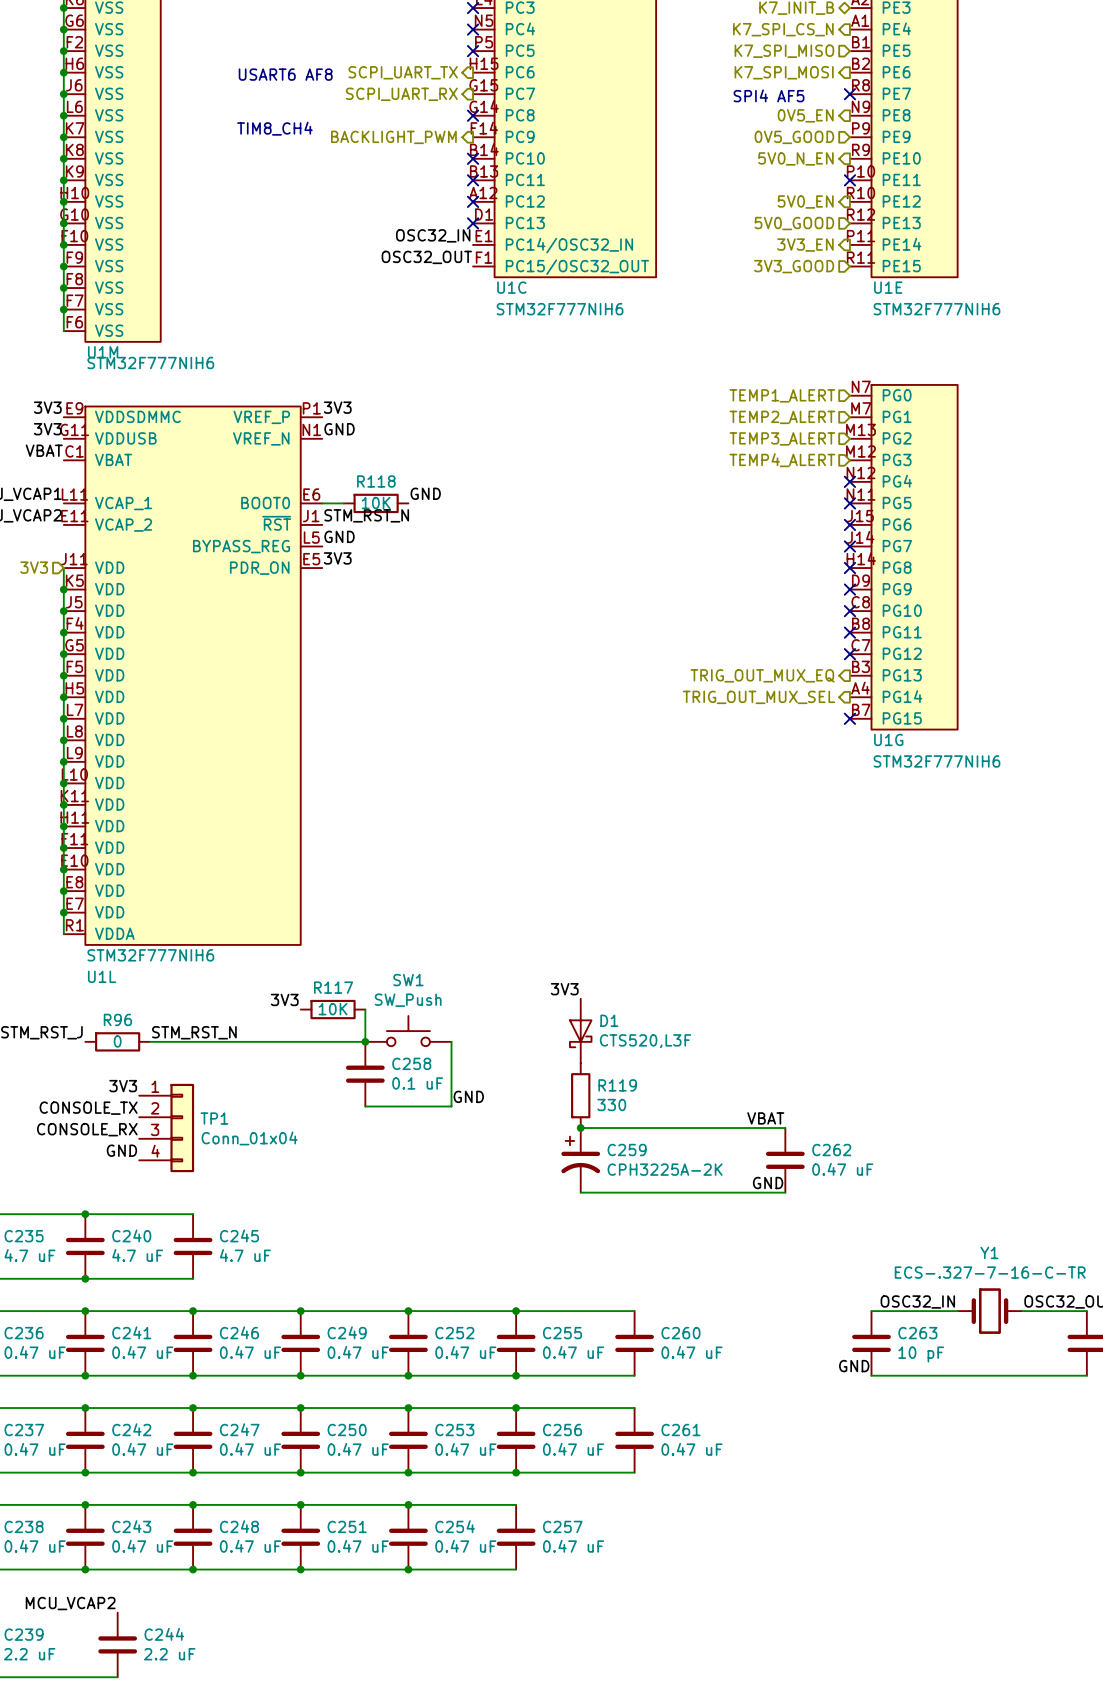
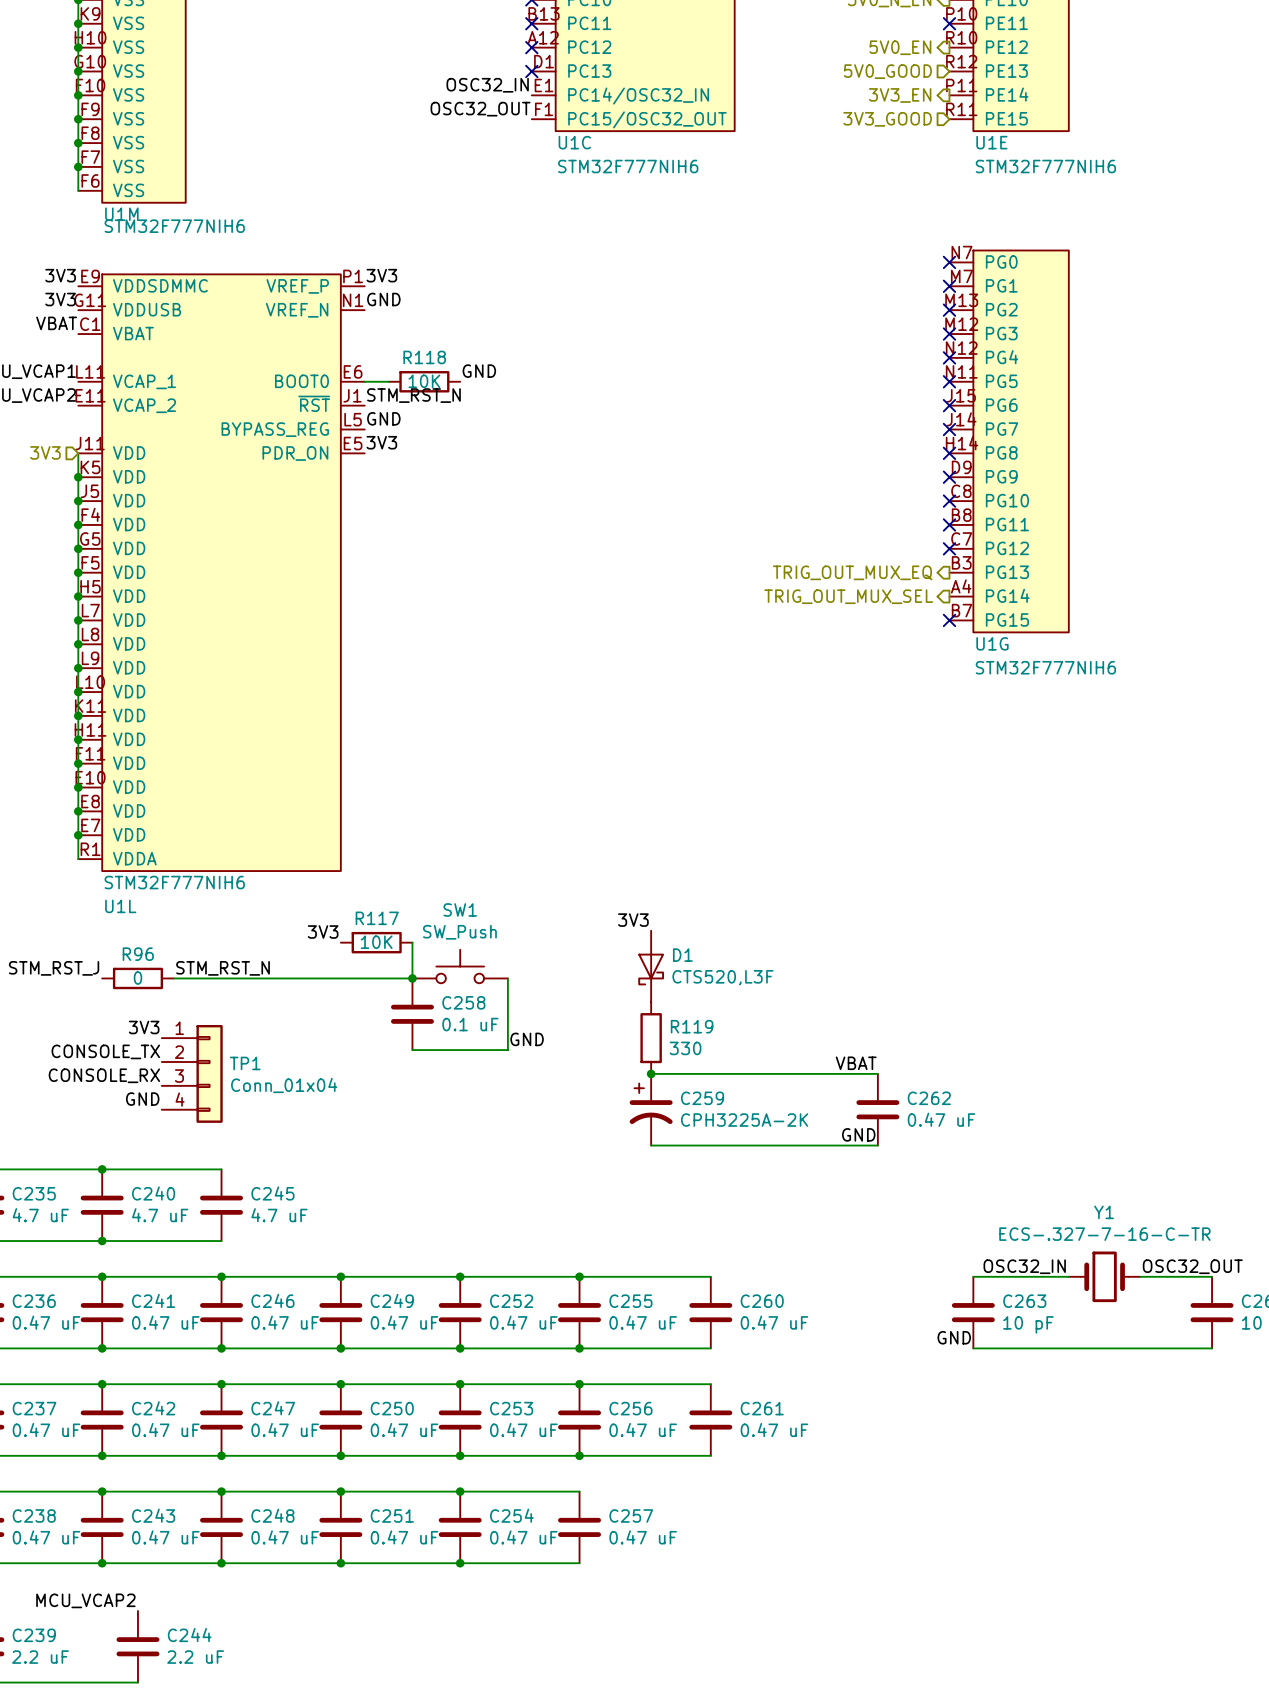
hierarchical label: TEMP1_ALERT (782, 395) -> none
no-connect mark: none -> (949, 262)
hierarchical label: TEMP2_ALERT (782, 417) -> none
no-connect mark: none -> (949, 286)
hierarchical label: TEMP3_ALERT (782, 438) -> none
no-connect mark: none -> (949, 310)
hierarchical label: TEMP4_ALERT (782, 460) -> none
no-connect mark: none -> (949, 334)

